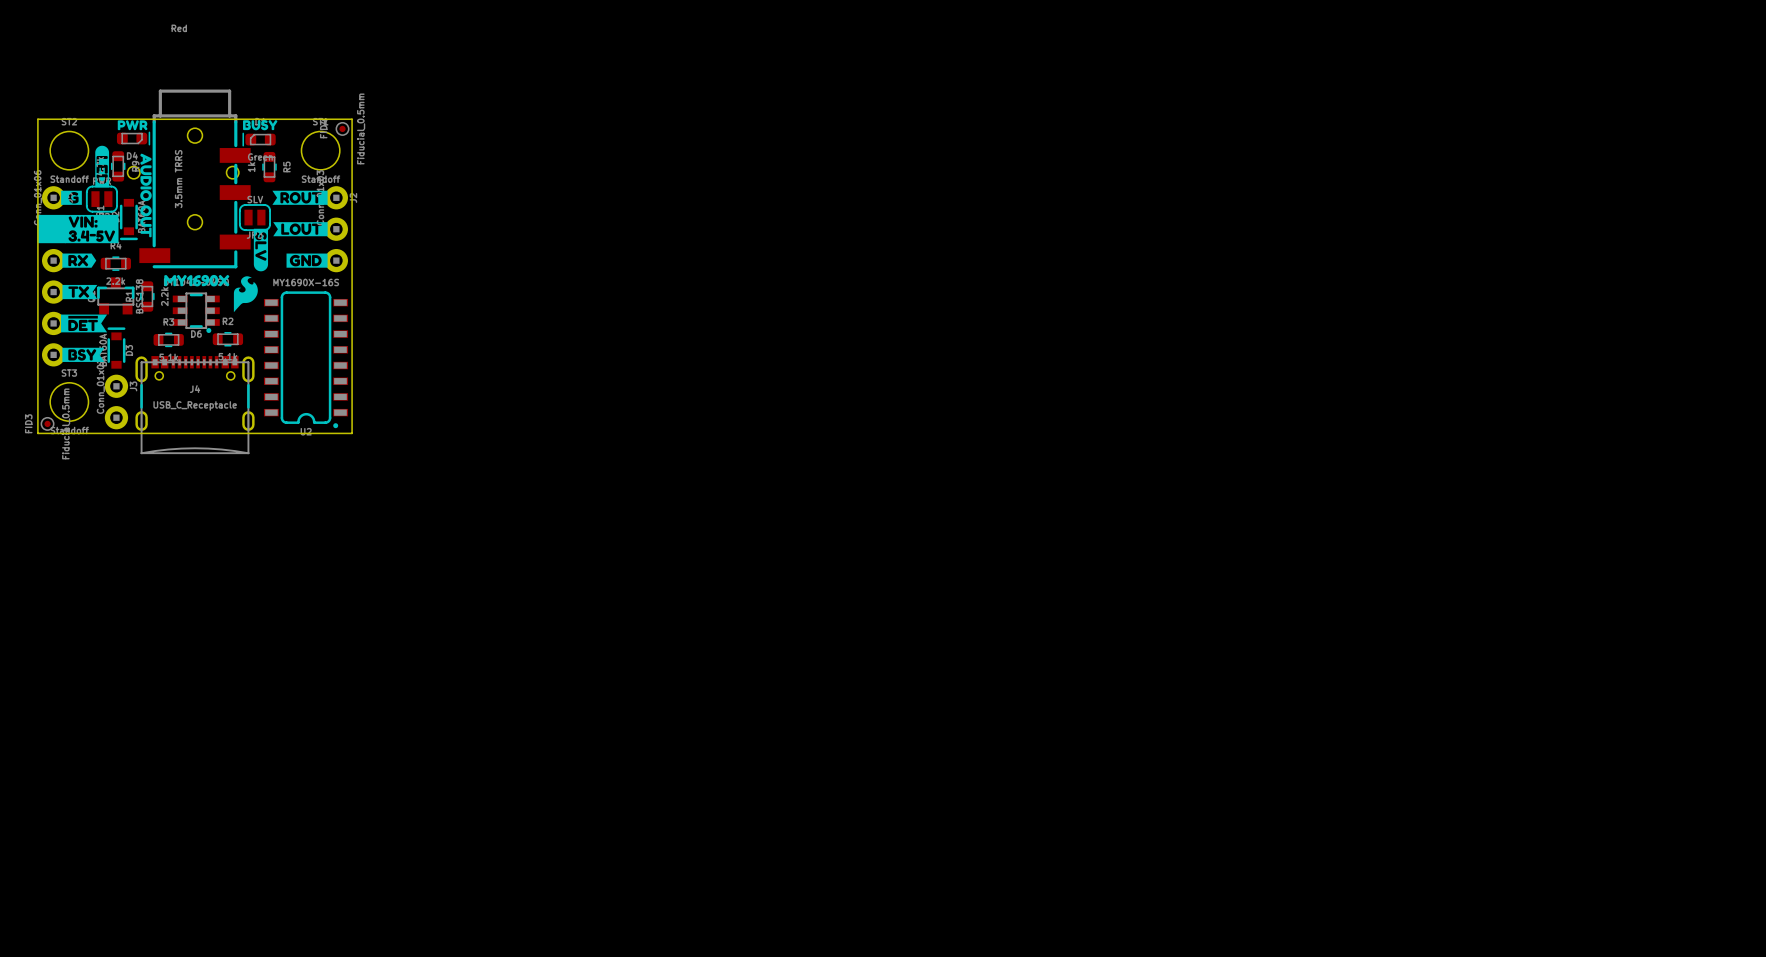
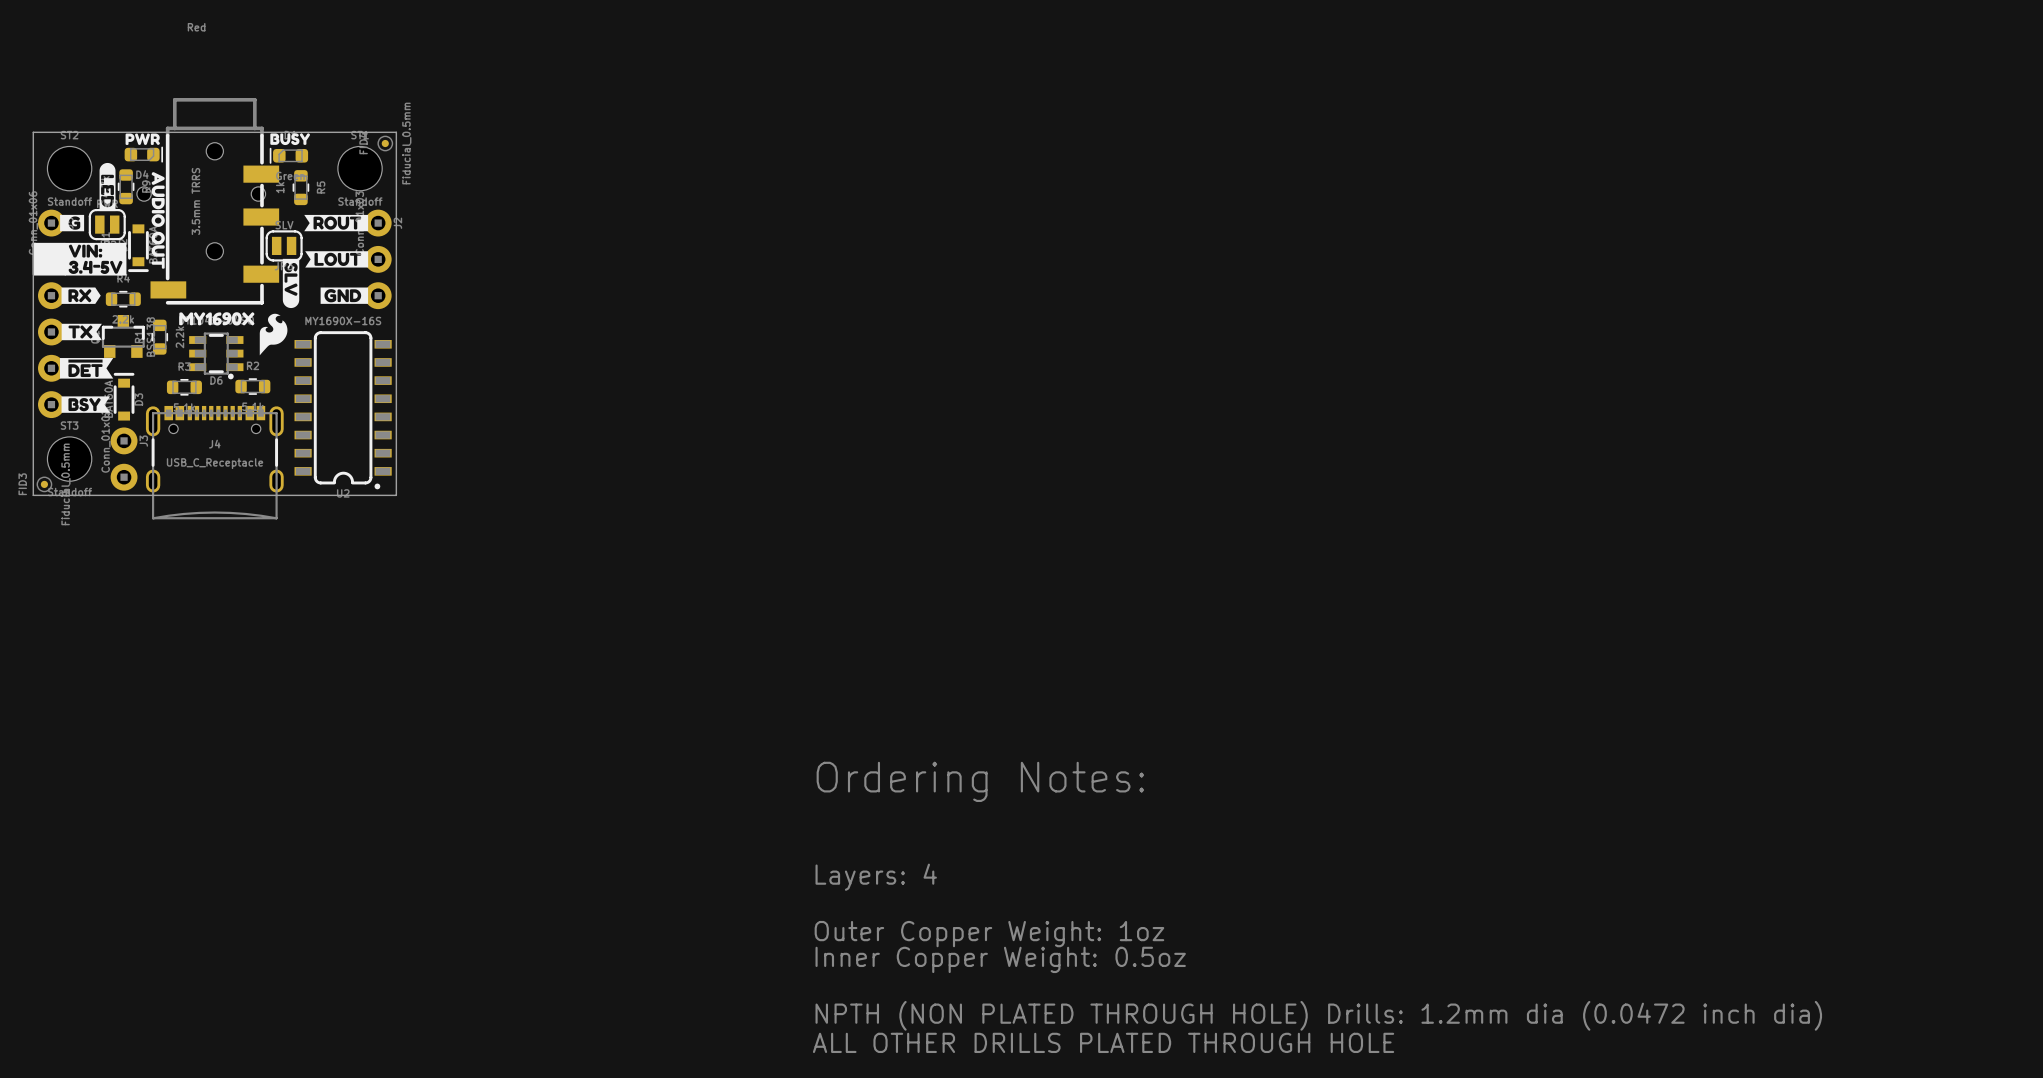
text: none -> Ordering Notes: (980, 781)
text: none -> Layers: 4 (876, 877)
text: none -> Outer Copper Weight: 1oz (989, 934)
text: none -> Inner Copper Weight: 0.5oz (1000, 959)
text: none -> NPTH (NON PLATED THROUGH HOLE) Drills: 1.2mm dia (0.0472 inch dia) (1318, 1015)
text: none -> ALL OTHER DRILLS PLATED THROUGH HOLE (1103, 1042)

